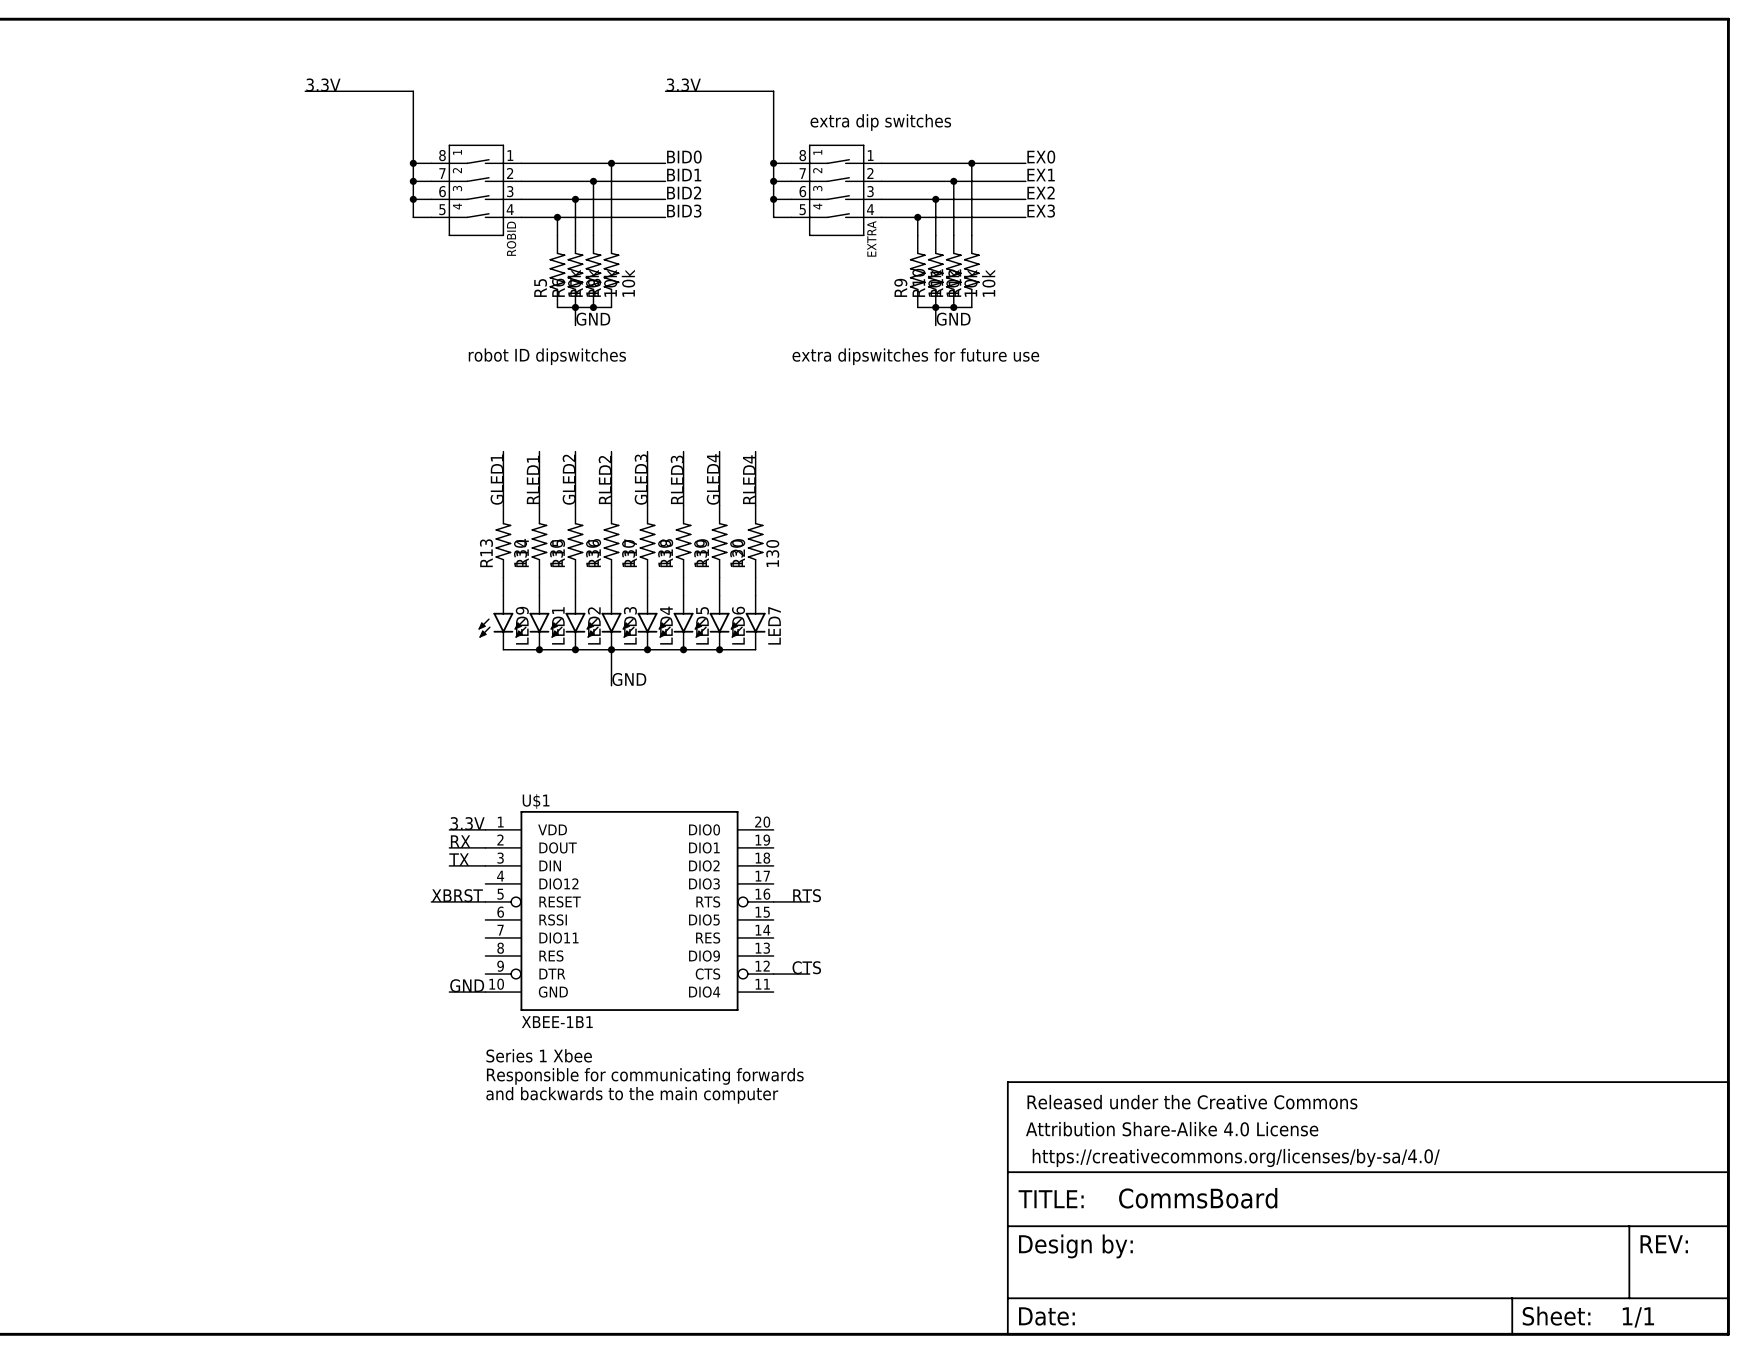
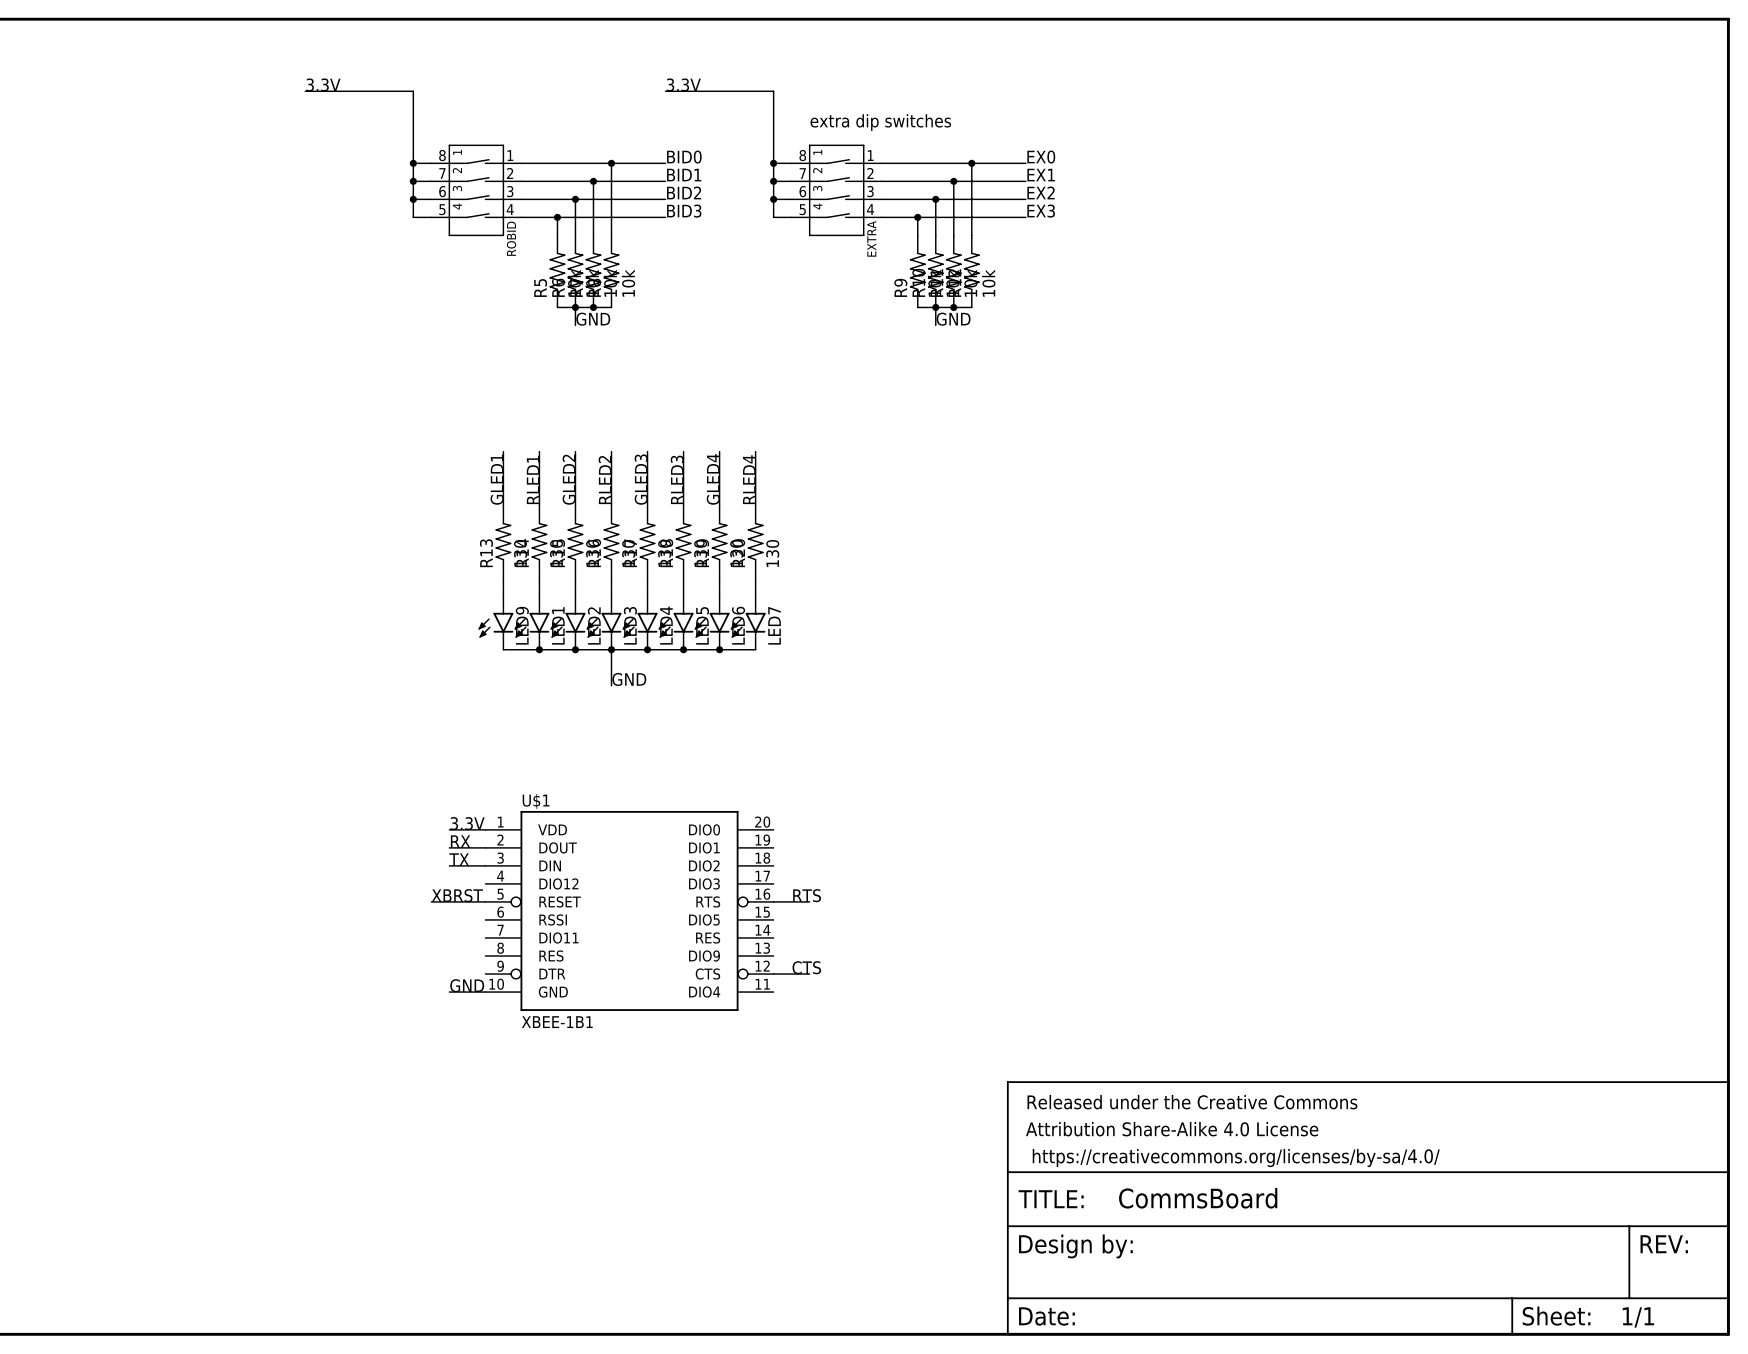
text: robot ID dipswitches (547, 356) -> none
text: extra dipswitches for future use (915, 356) -> none
text: Series 1 Xbee (539, 1055) -> none
text: Responsible for communicating forwards (645, 1076) -> none
text: and backwards to the main computer (632, 1095) -> none

